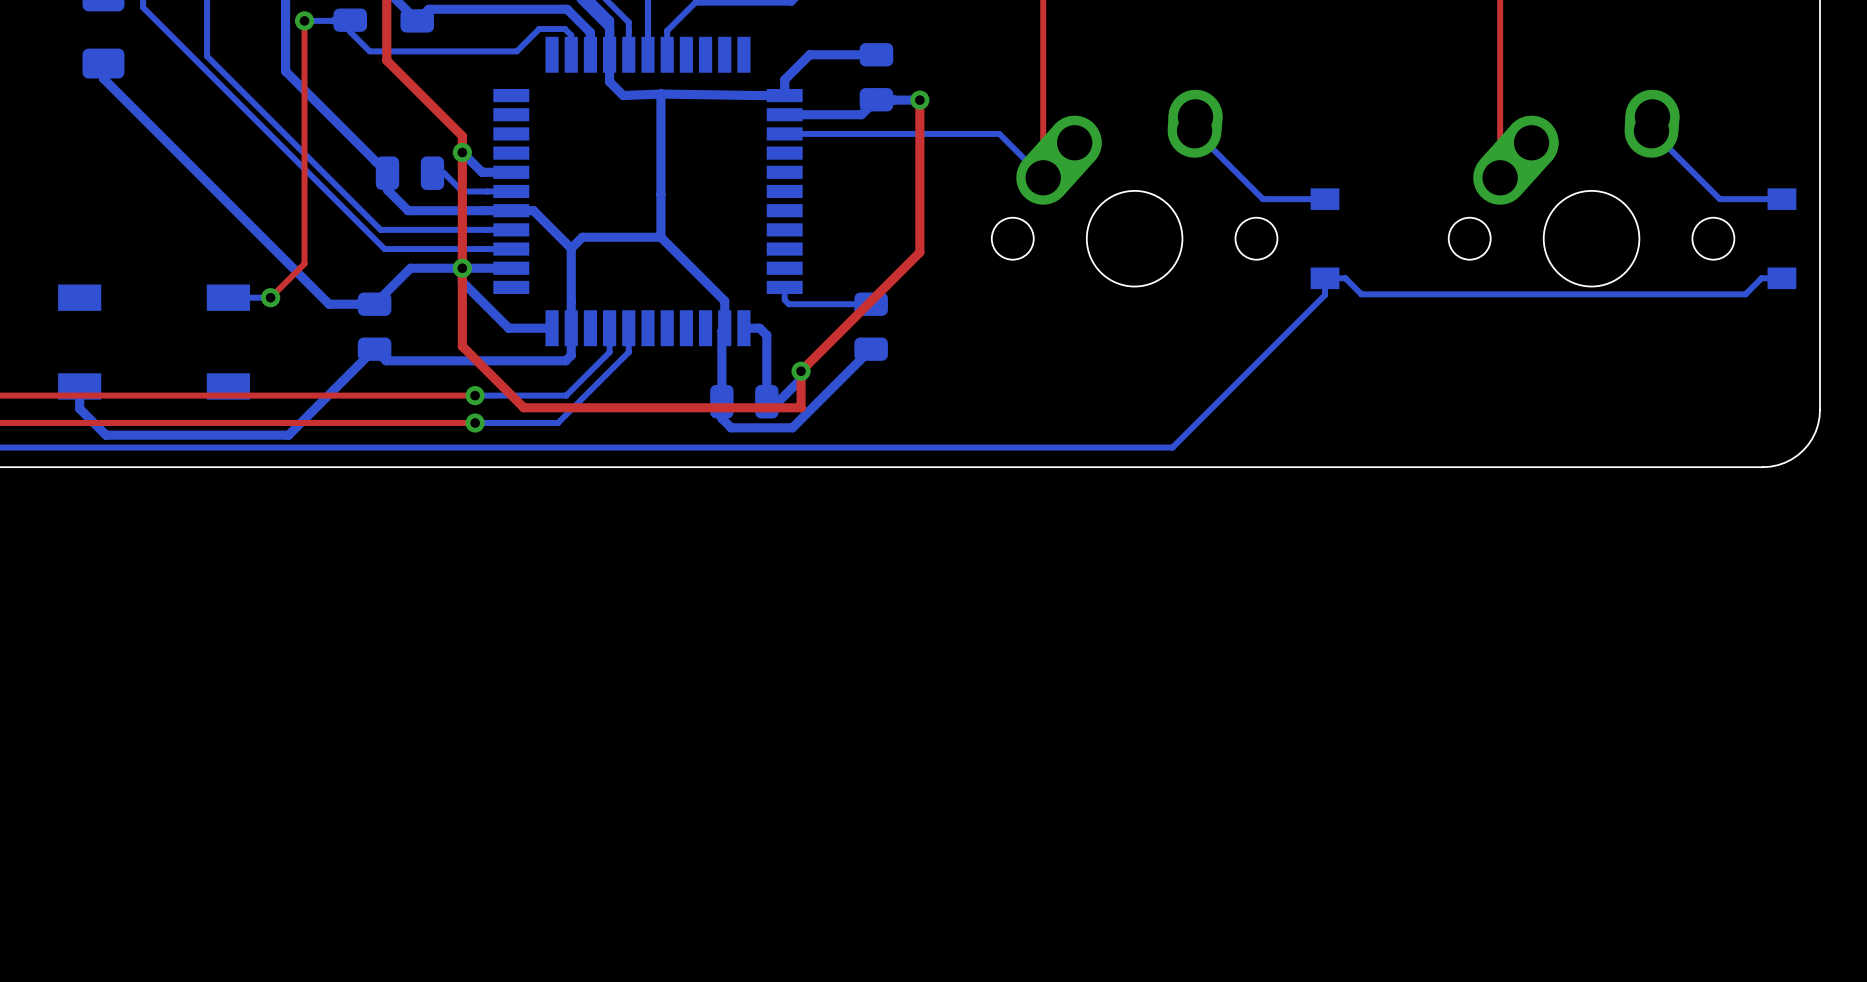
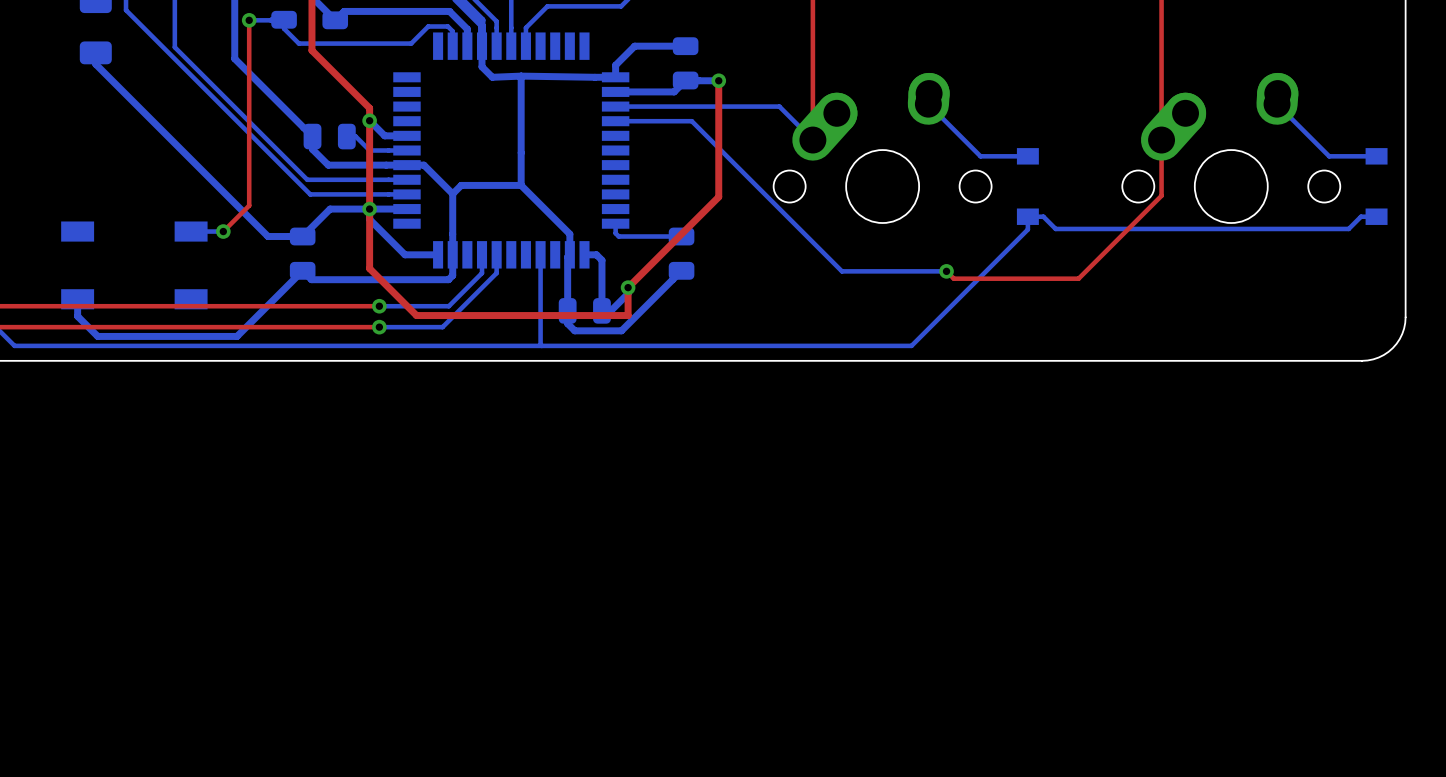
bottom track: none -> (615, 121) (691, 121) (841, 271) (946, 271)
top track: none -> (1161, 140) (1161, 195) (1078, 278) (953, 278) (946, 271)
bottom track: none -> (540, 254) (541, 345)
via: none -> (946, 271)

